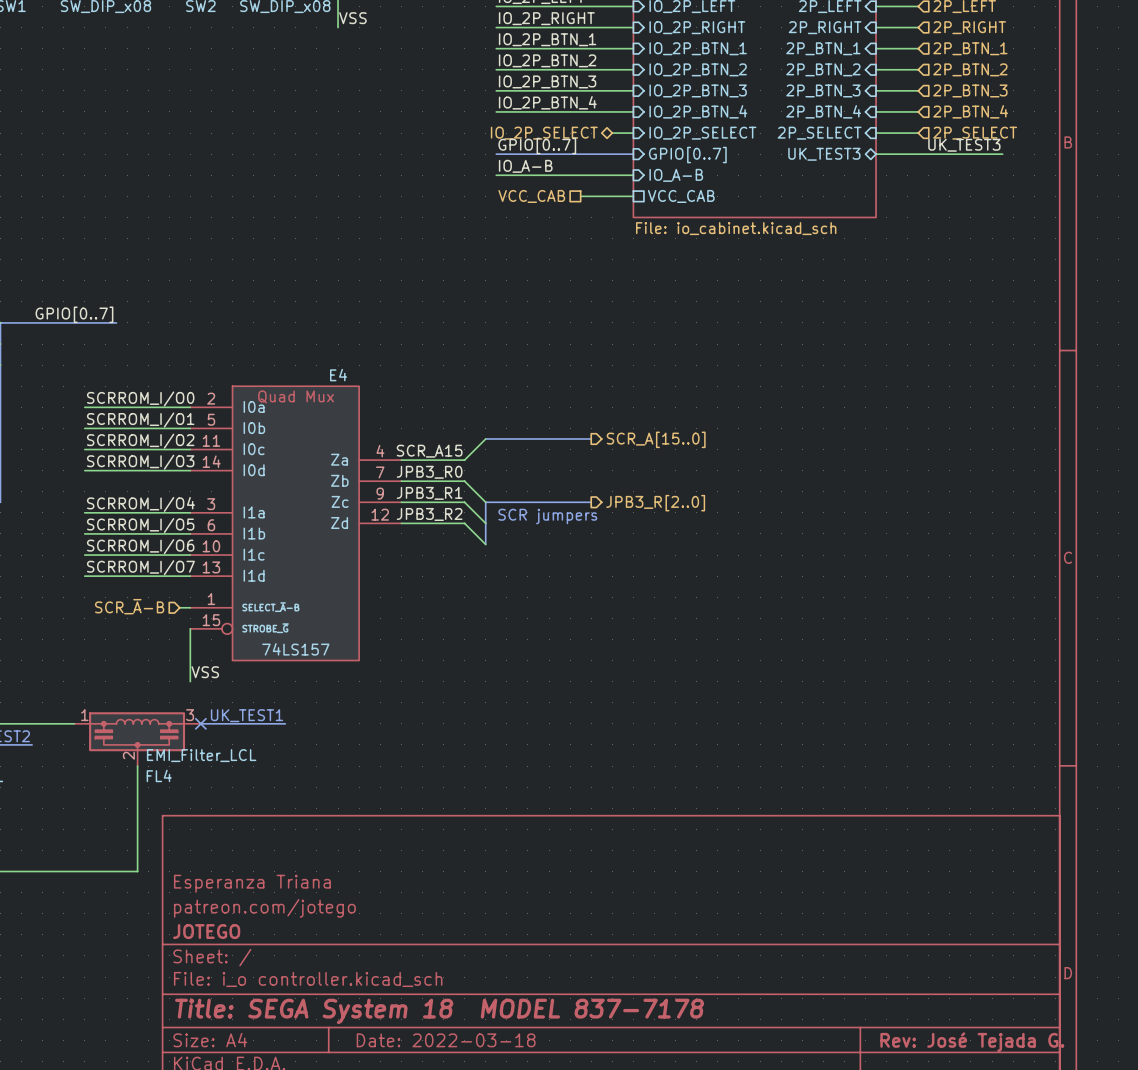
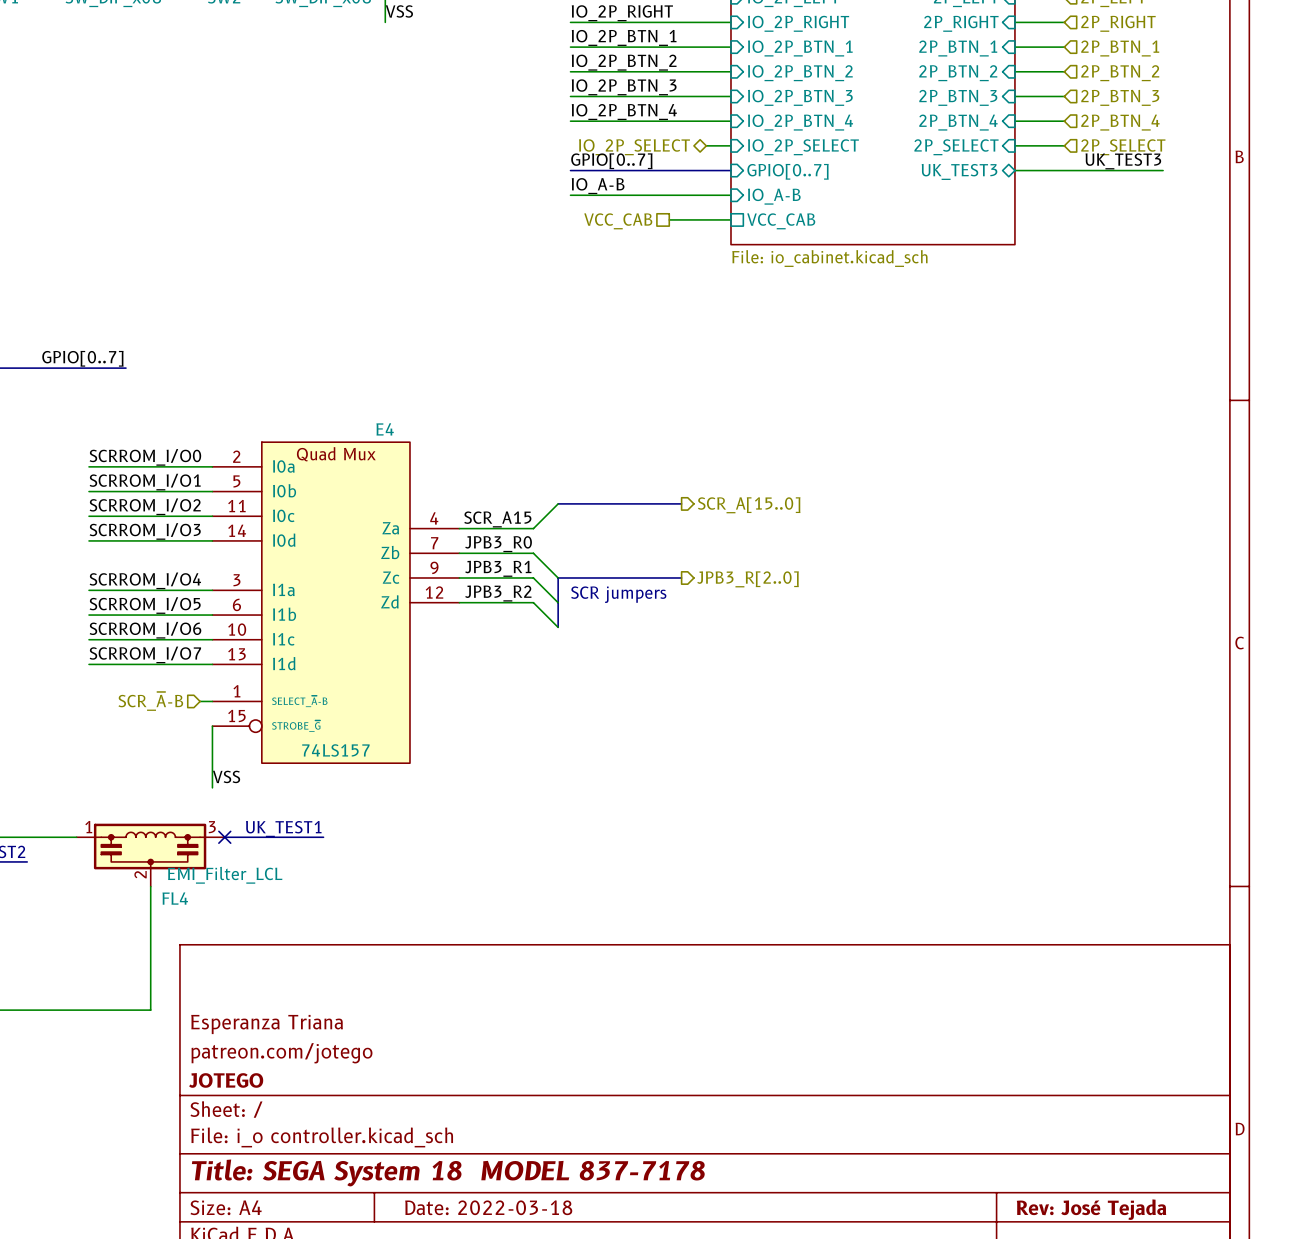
title block: Rev: José Tejada G. (972, 1042) -> Rev: José Tejada (1091, 1209)

